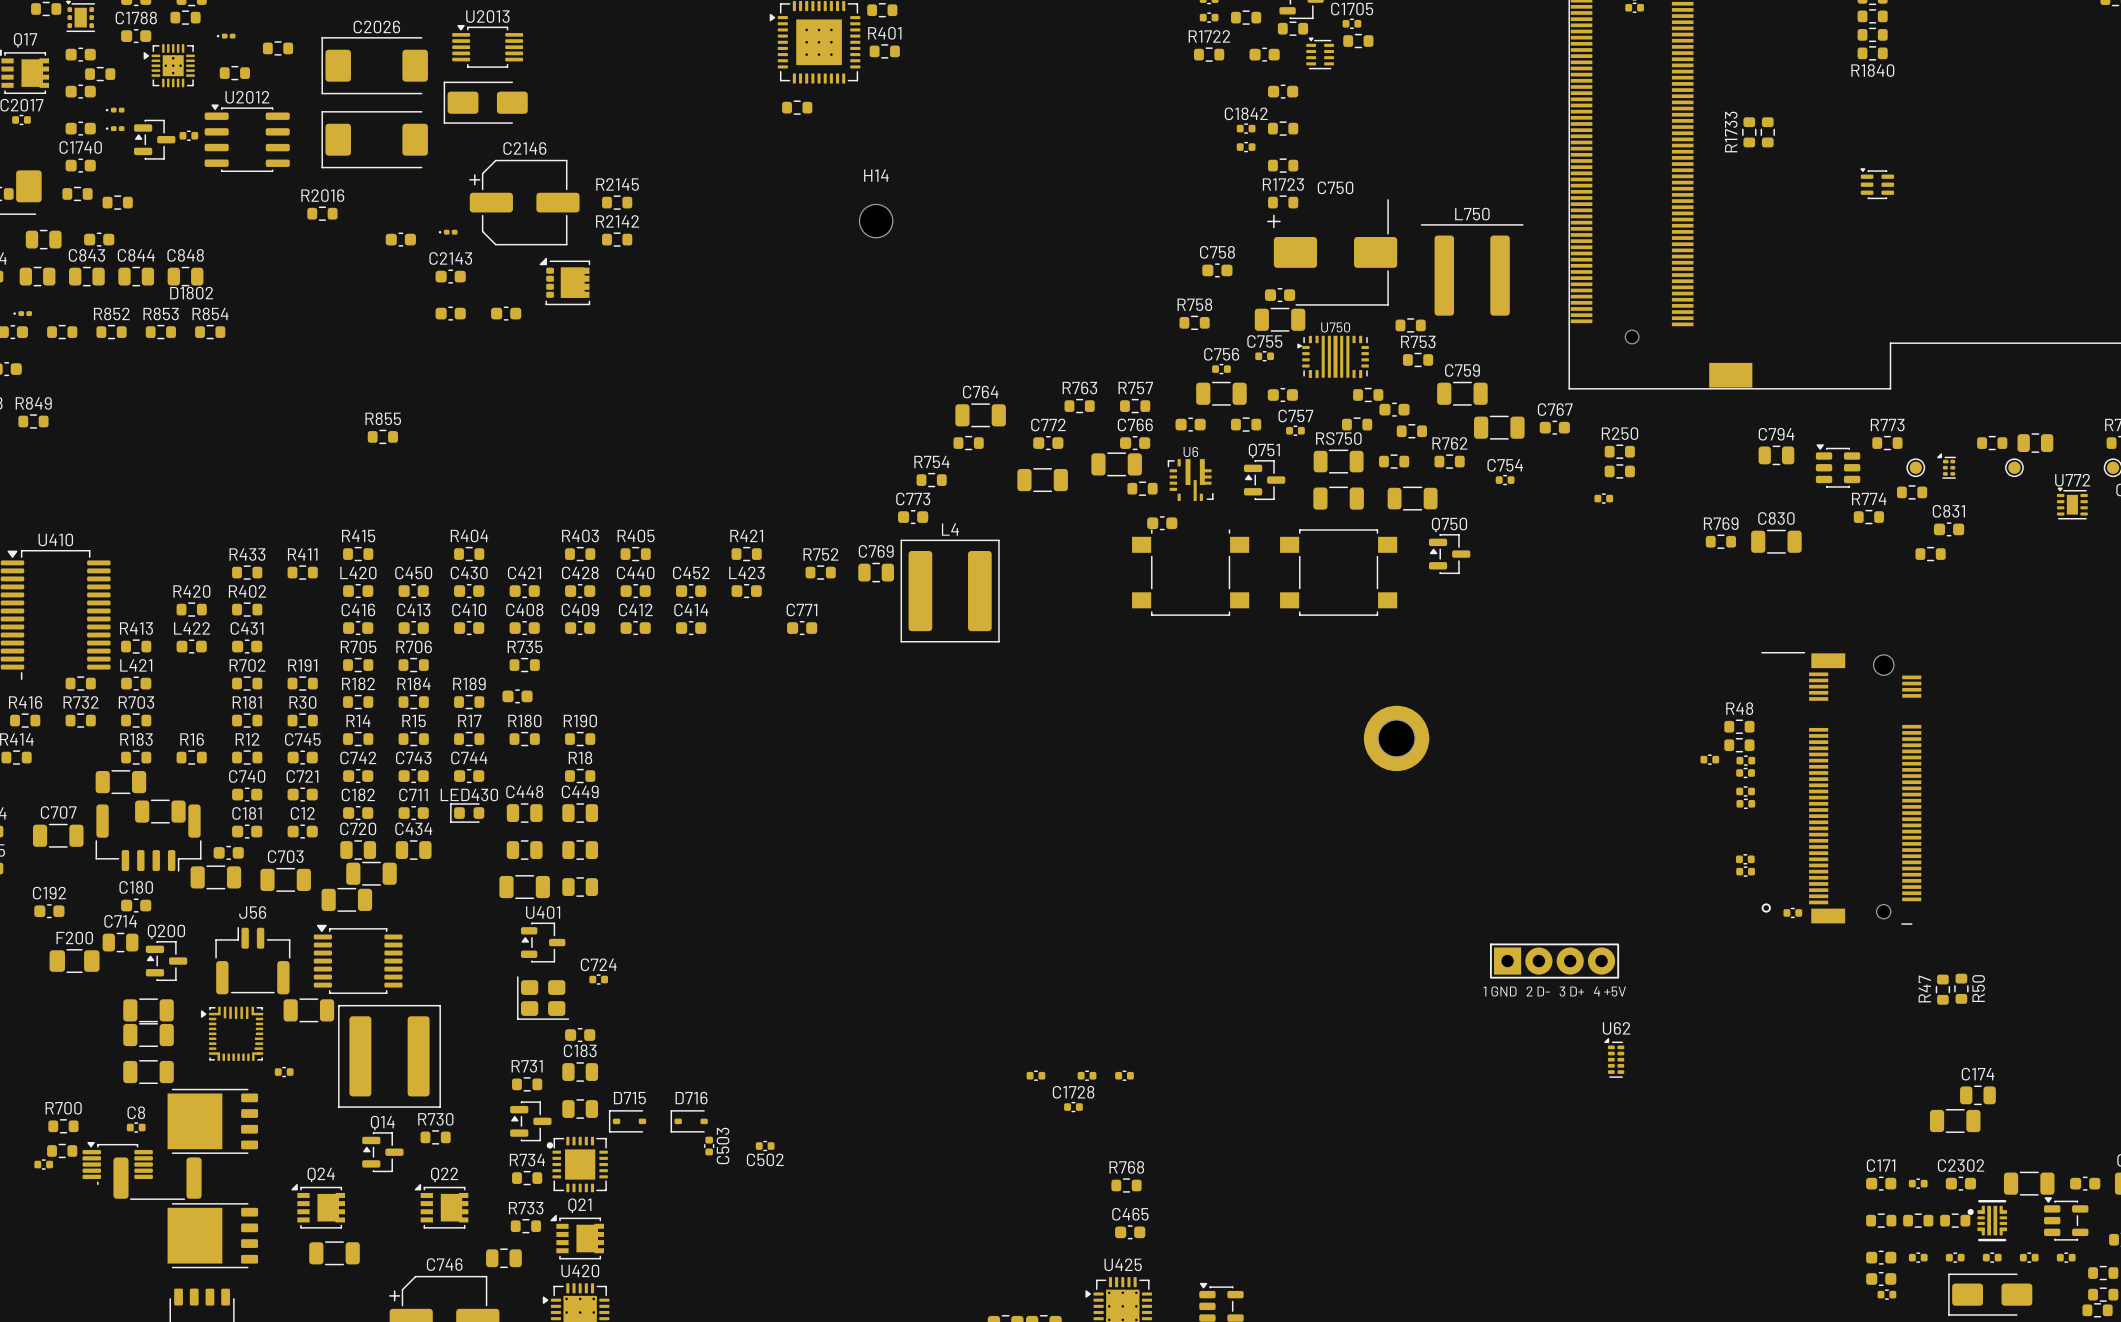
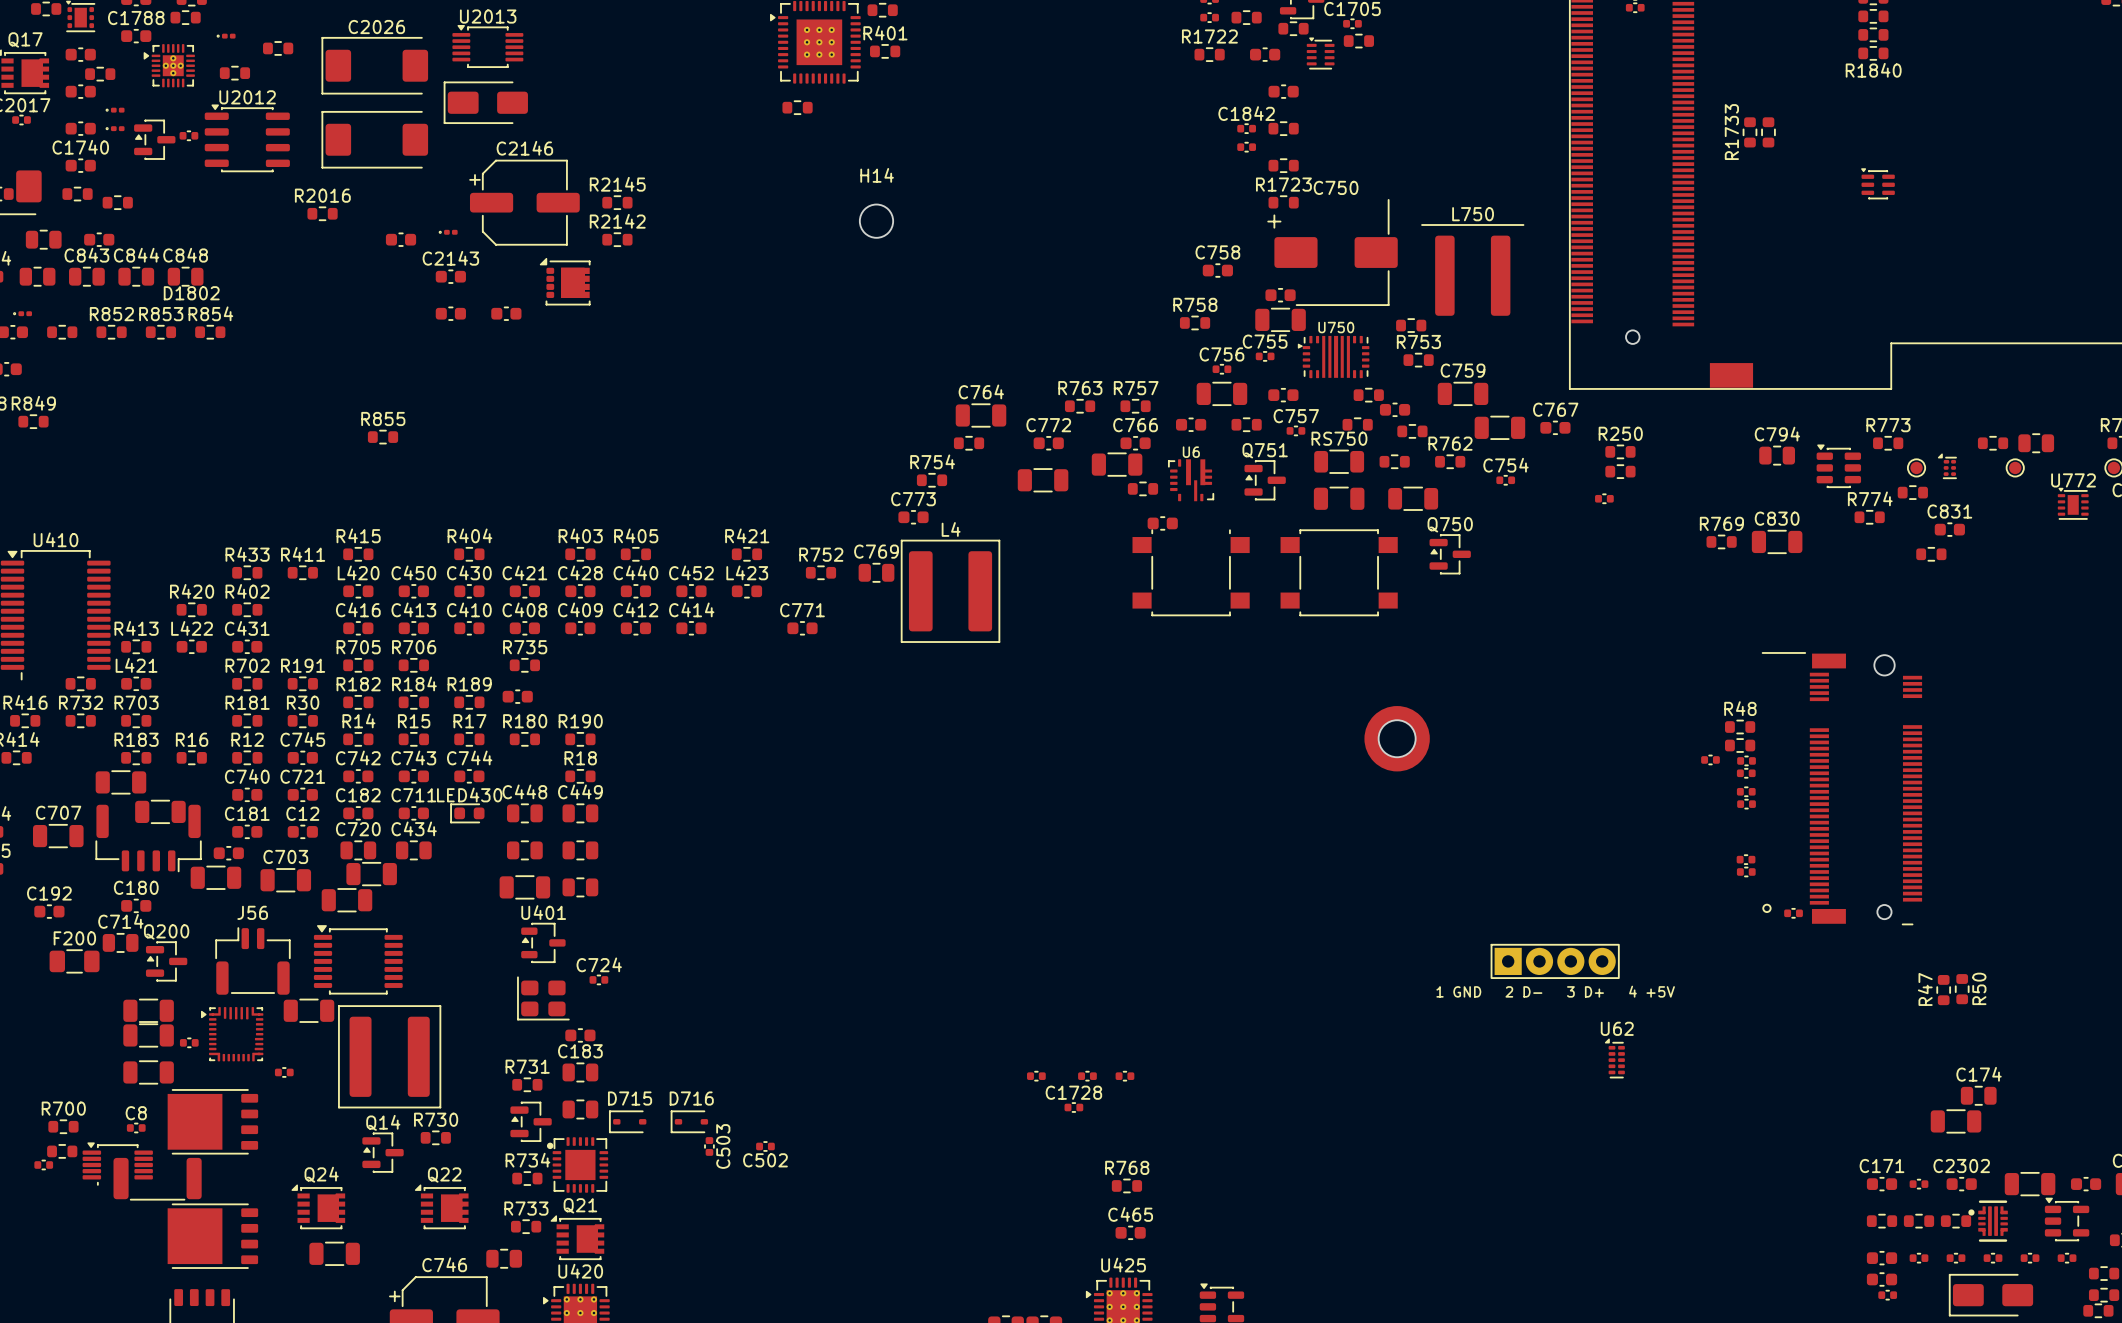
part: none -> (189, 1042)

